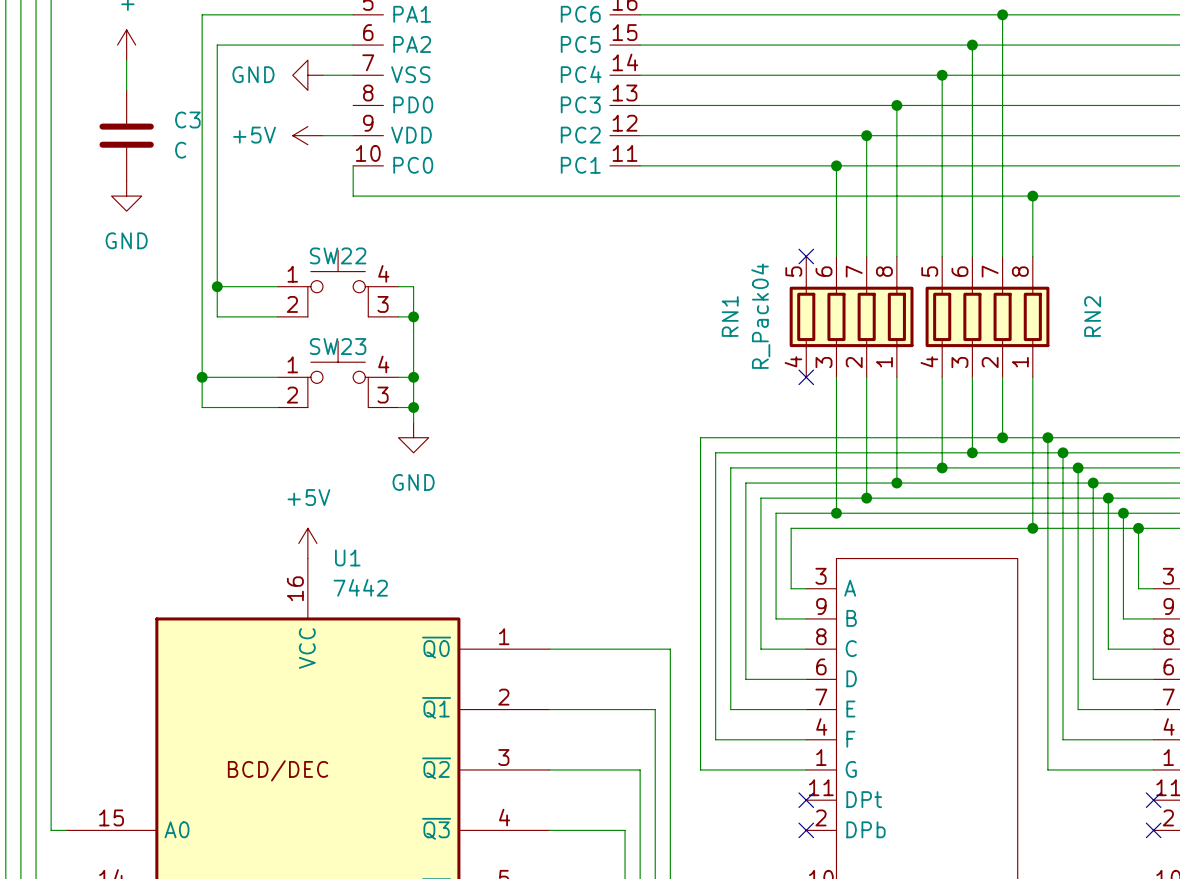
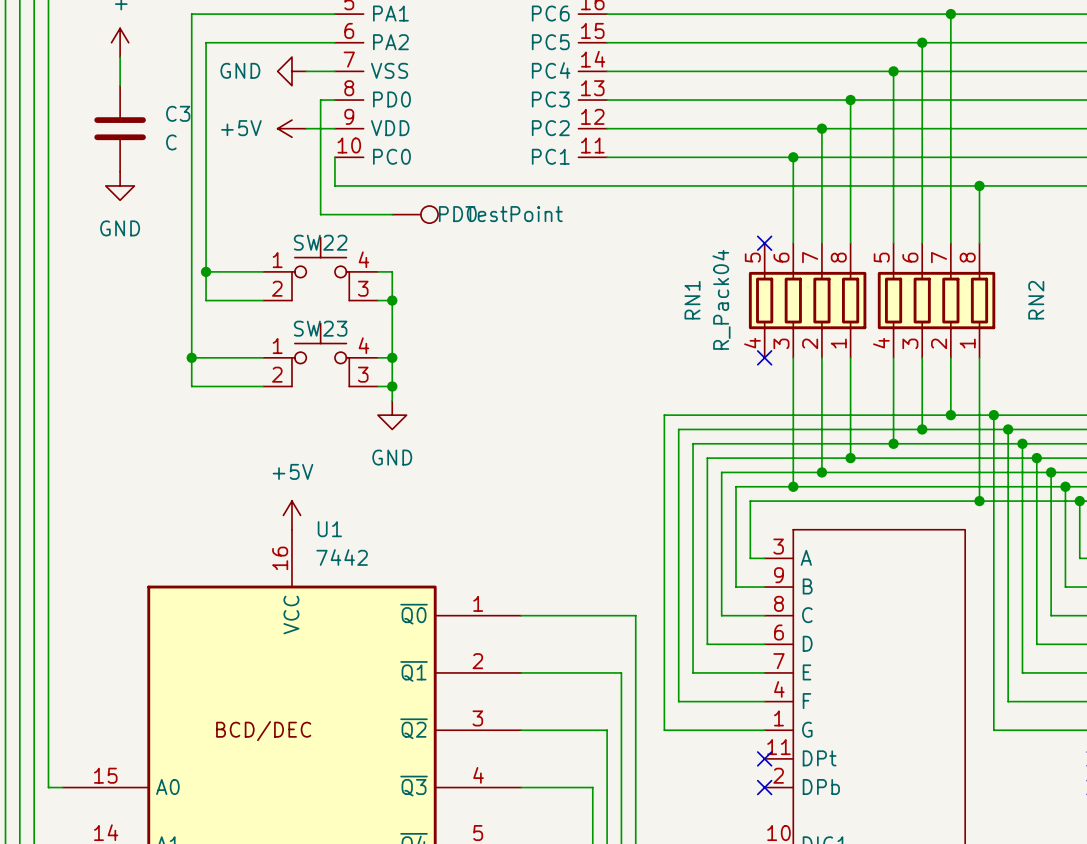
wire: none -> (334, 100) (320, 100) (320, 214) (392, 214)
PD0: none -> TestPoint (415, 214)

